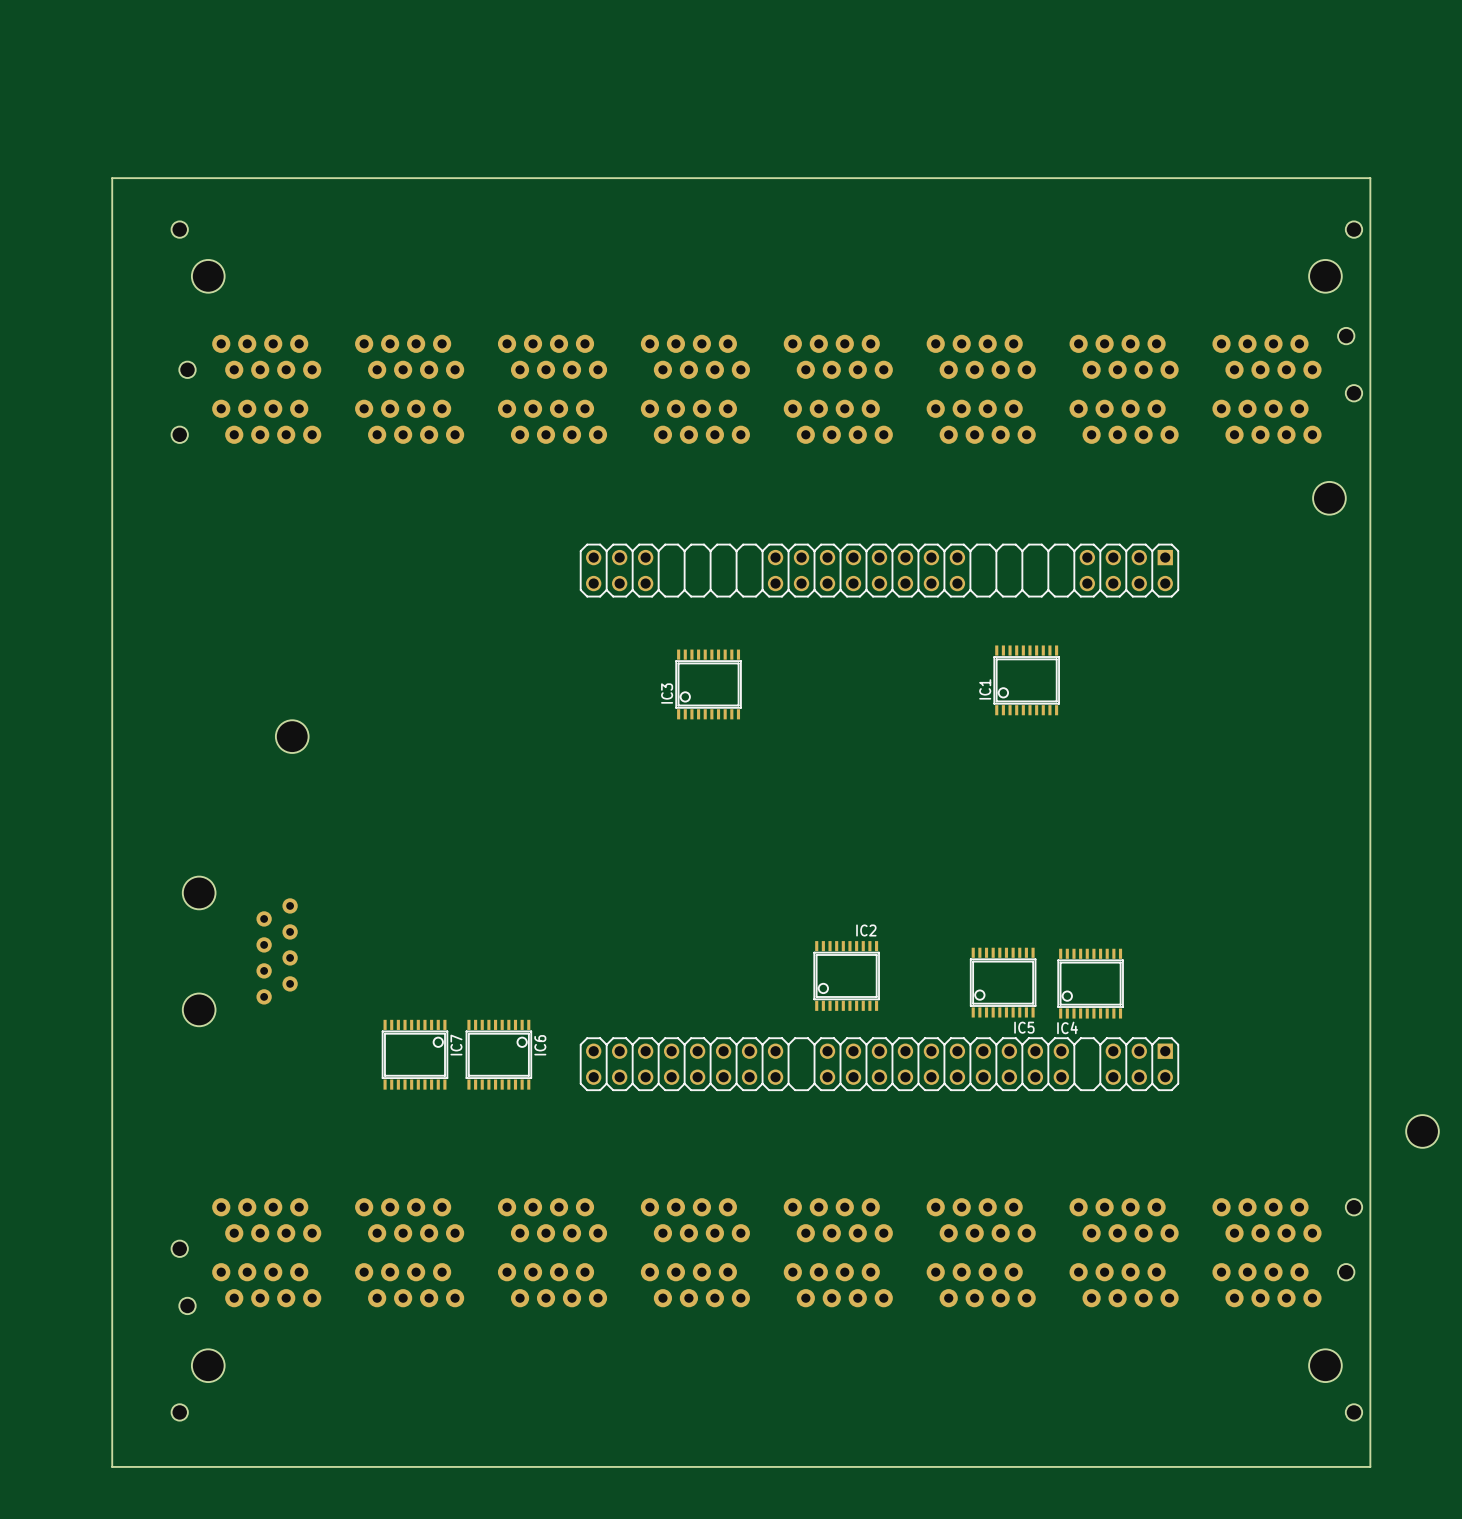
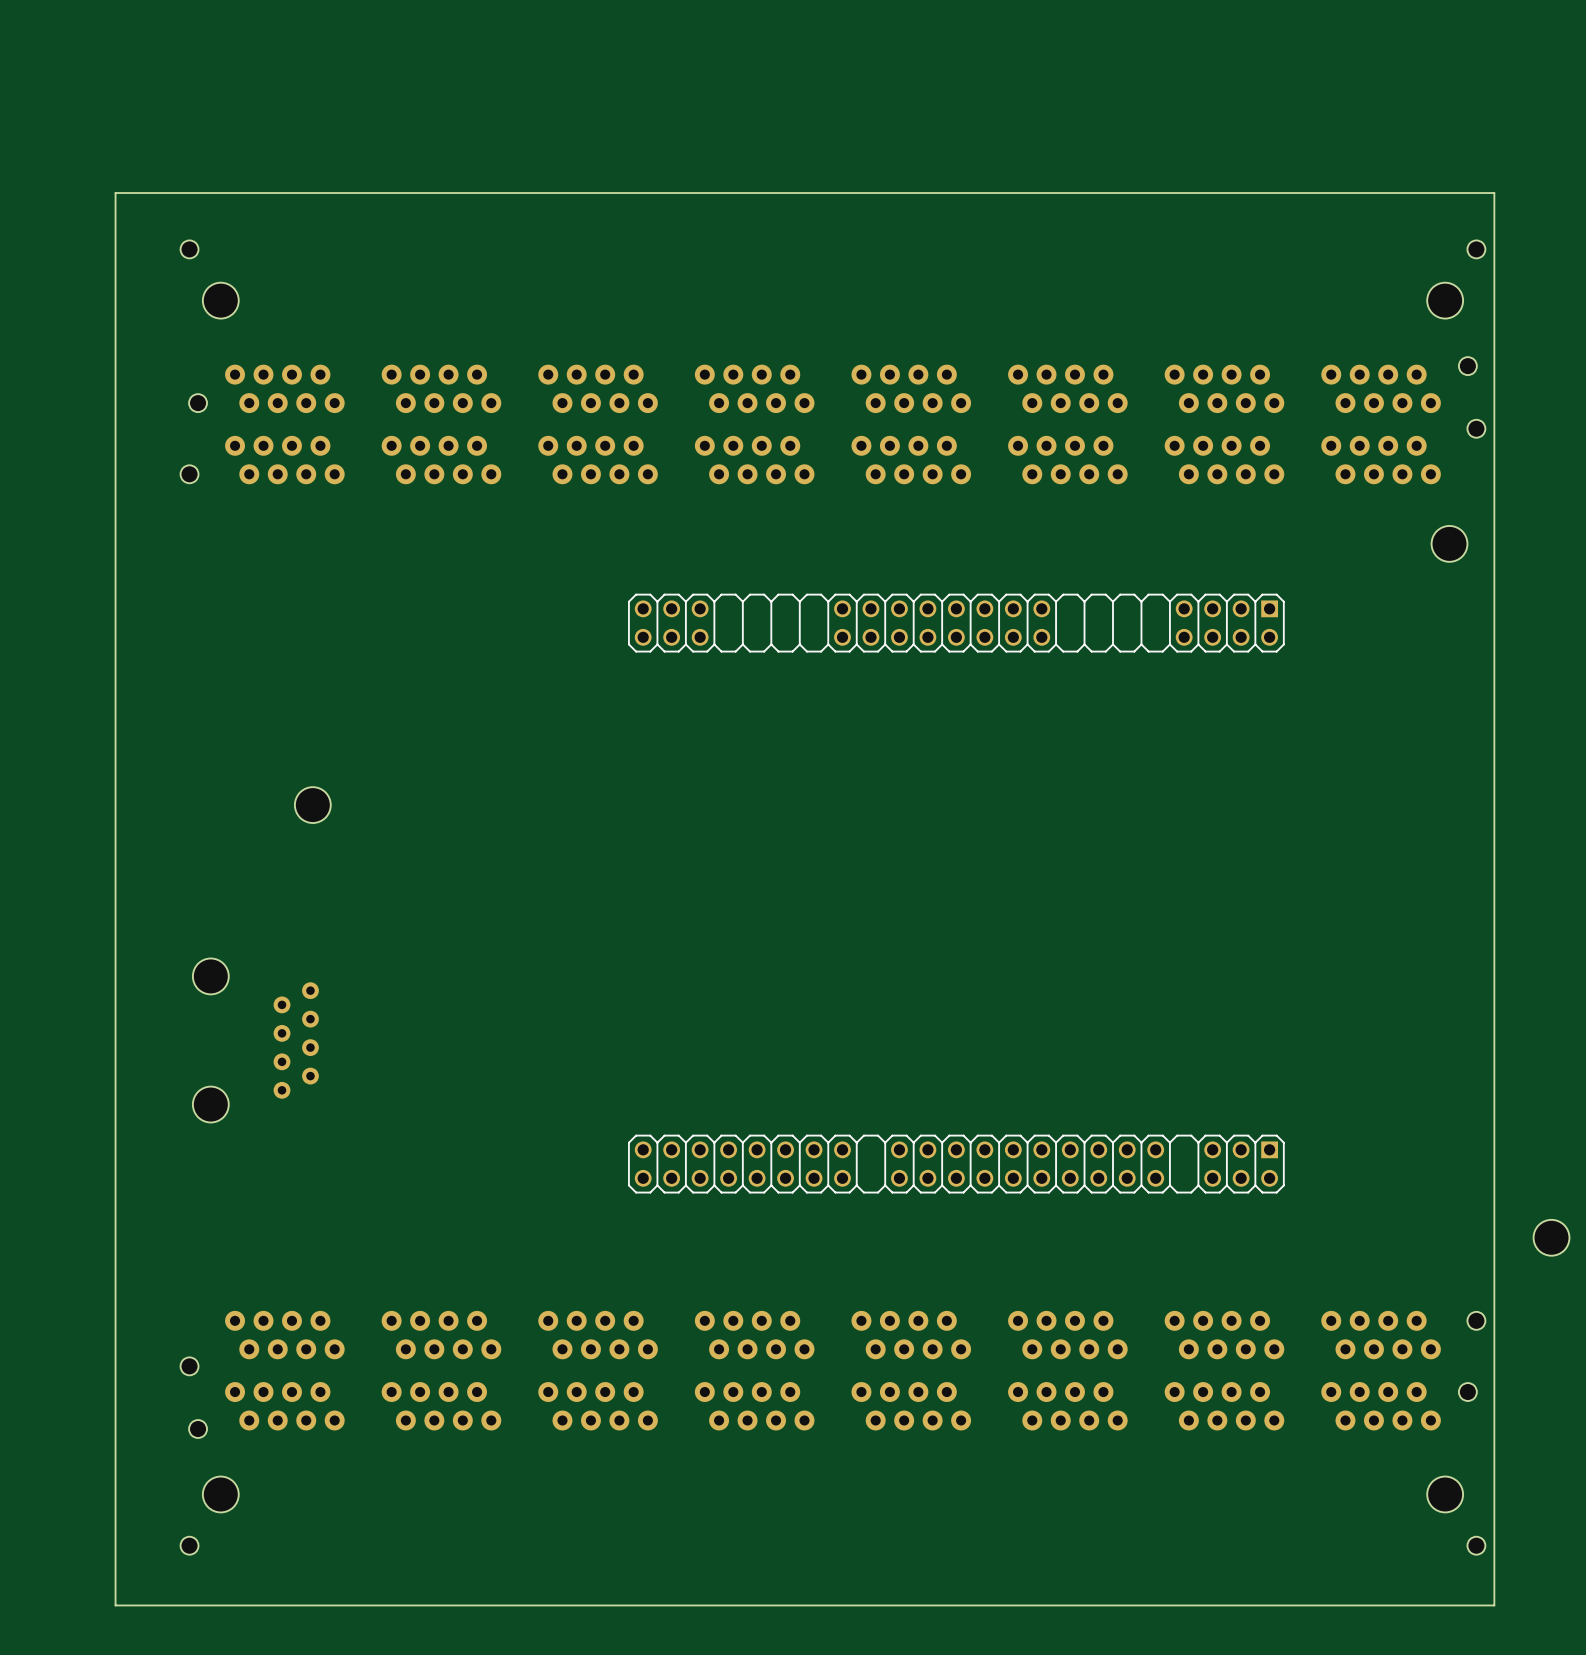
IC1: (1026, 680) -> none
IC3: (708, 684) -> none
IC2: (846, 975) -> none
IC5: (1003, 982) -> none
IC4: (1090, 983) -> none
IC7: (414, 1054) -> none
IC6: (498, 1054) -> none

